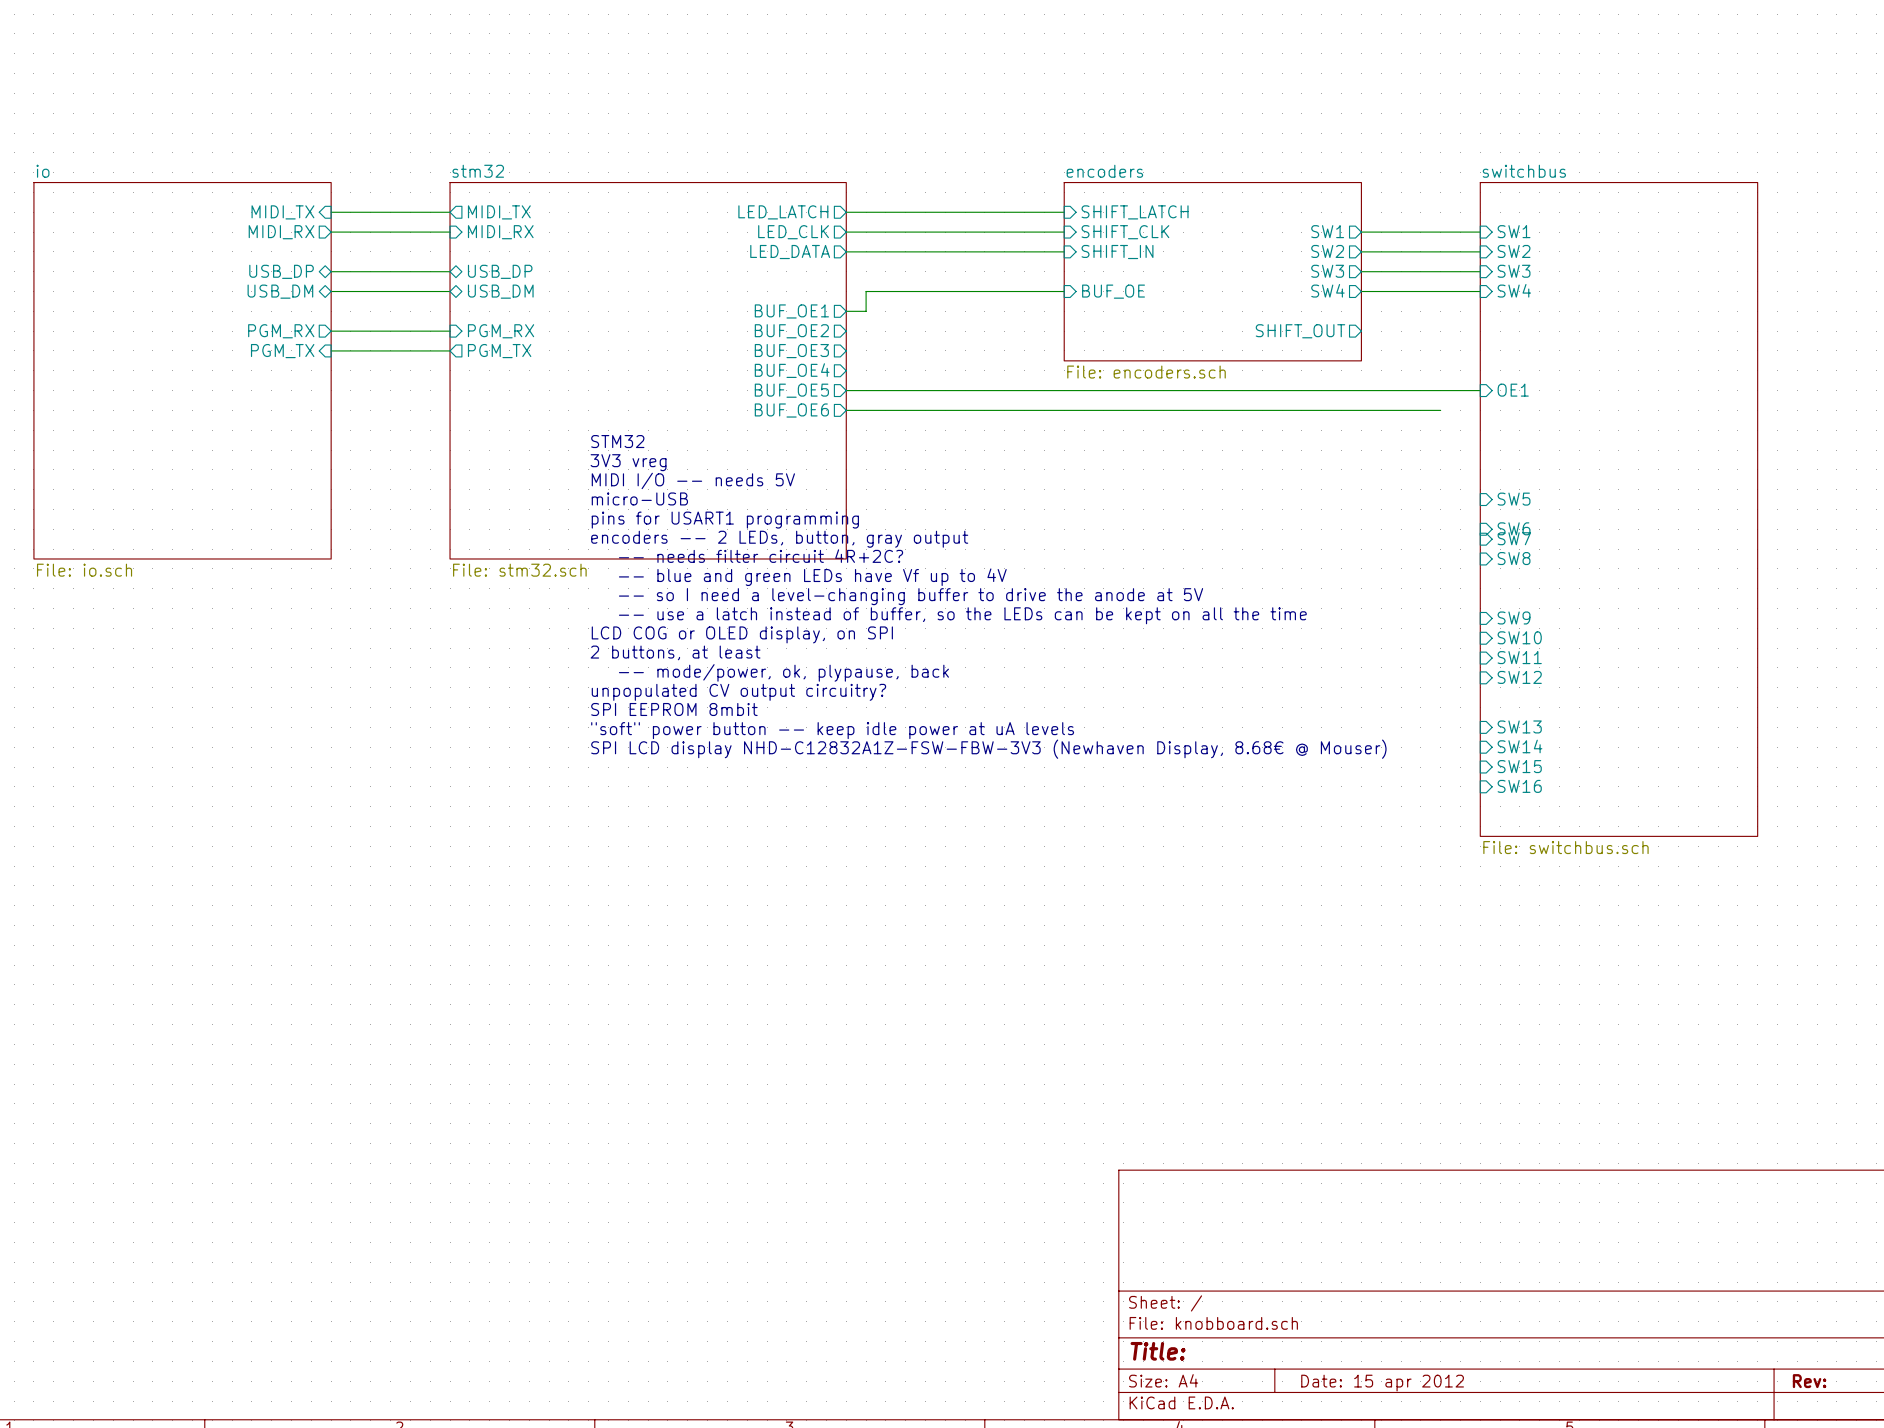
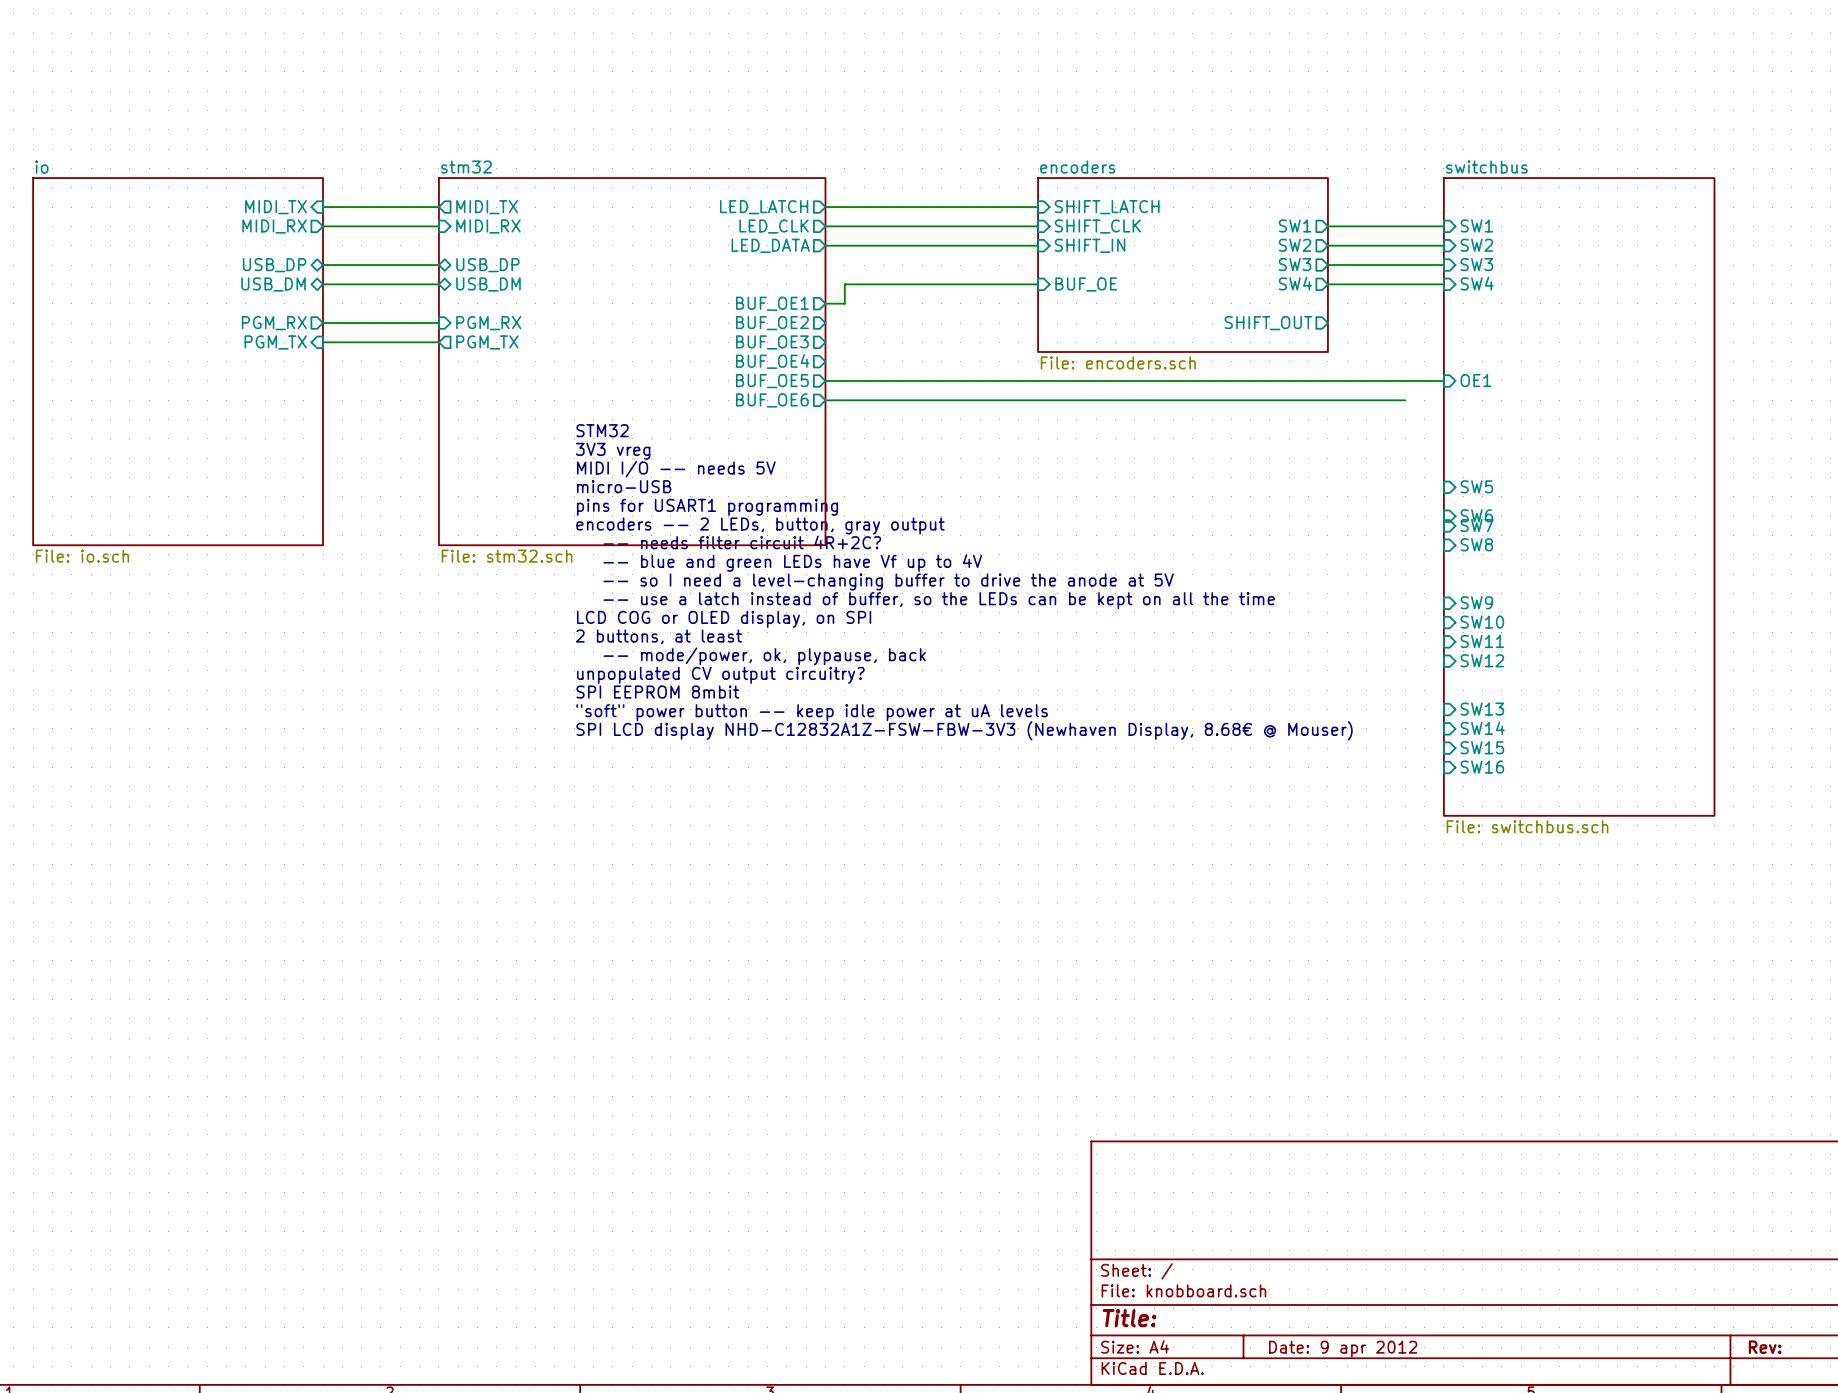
title block: Date: 15 apr 2012 (1382, 1383) -> Date: 9 apr 2012 (1343, 1349)

